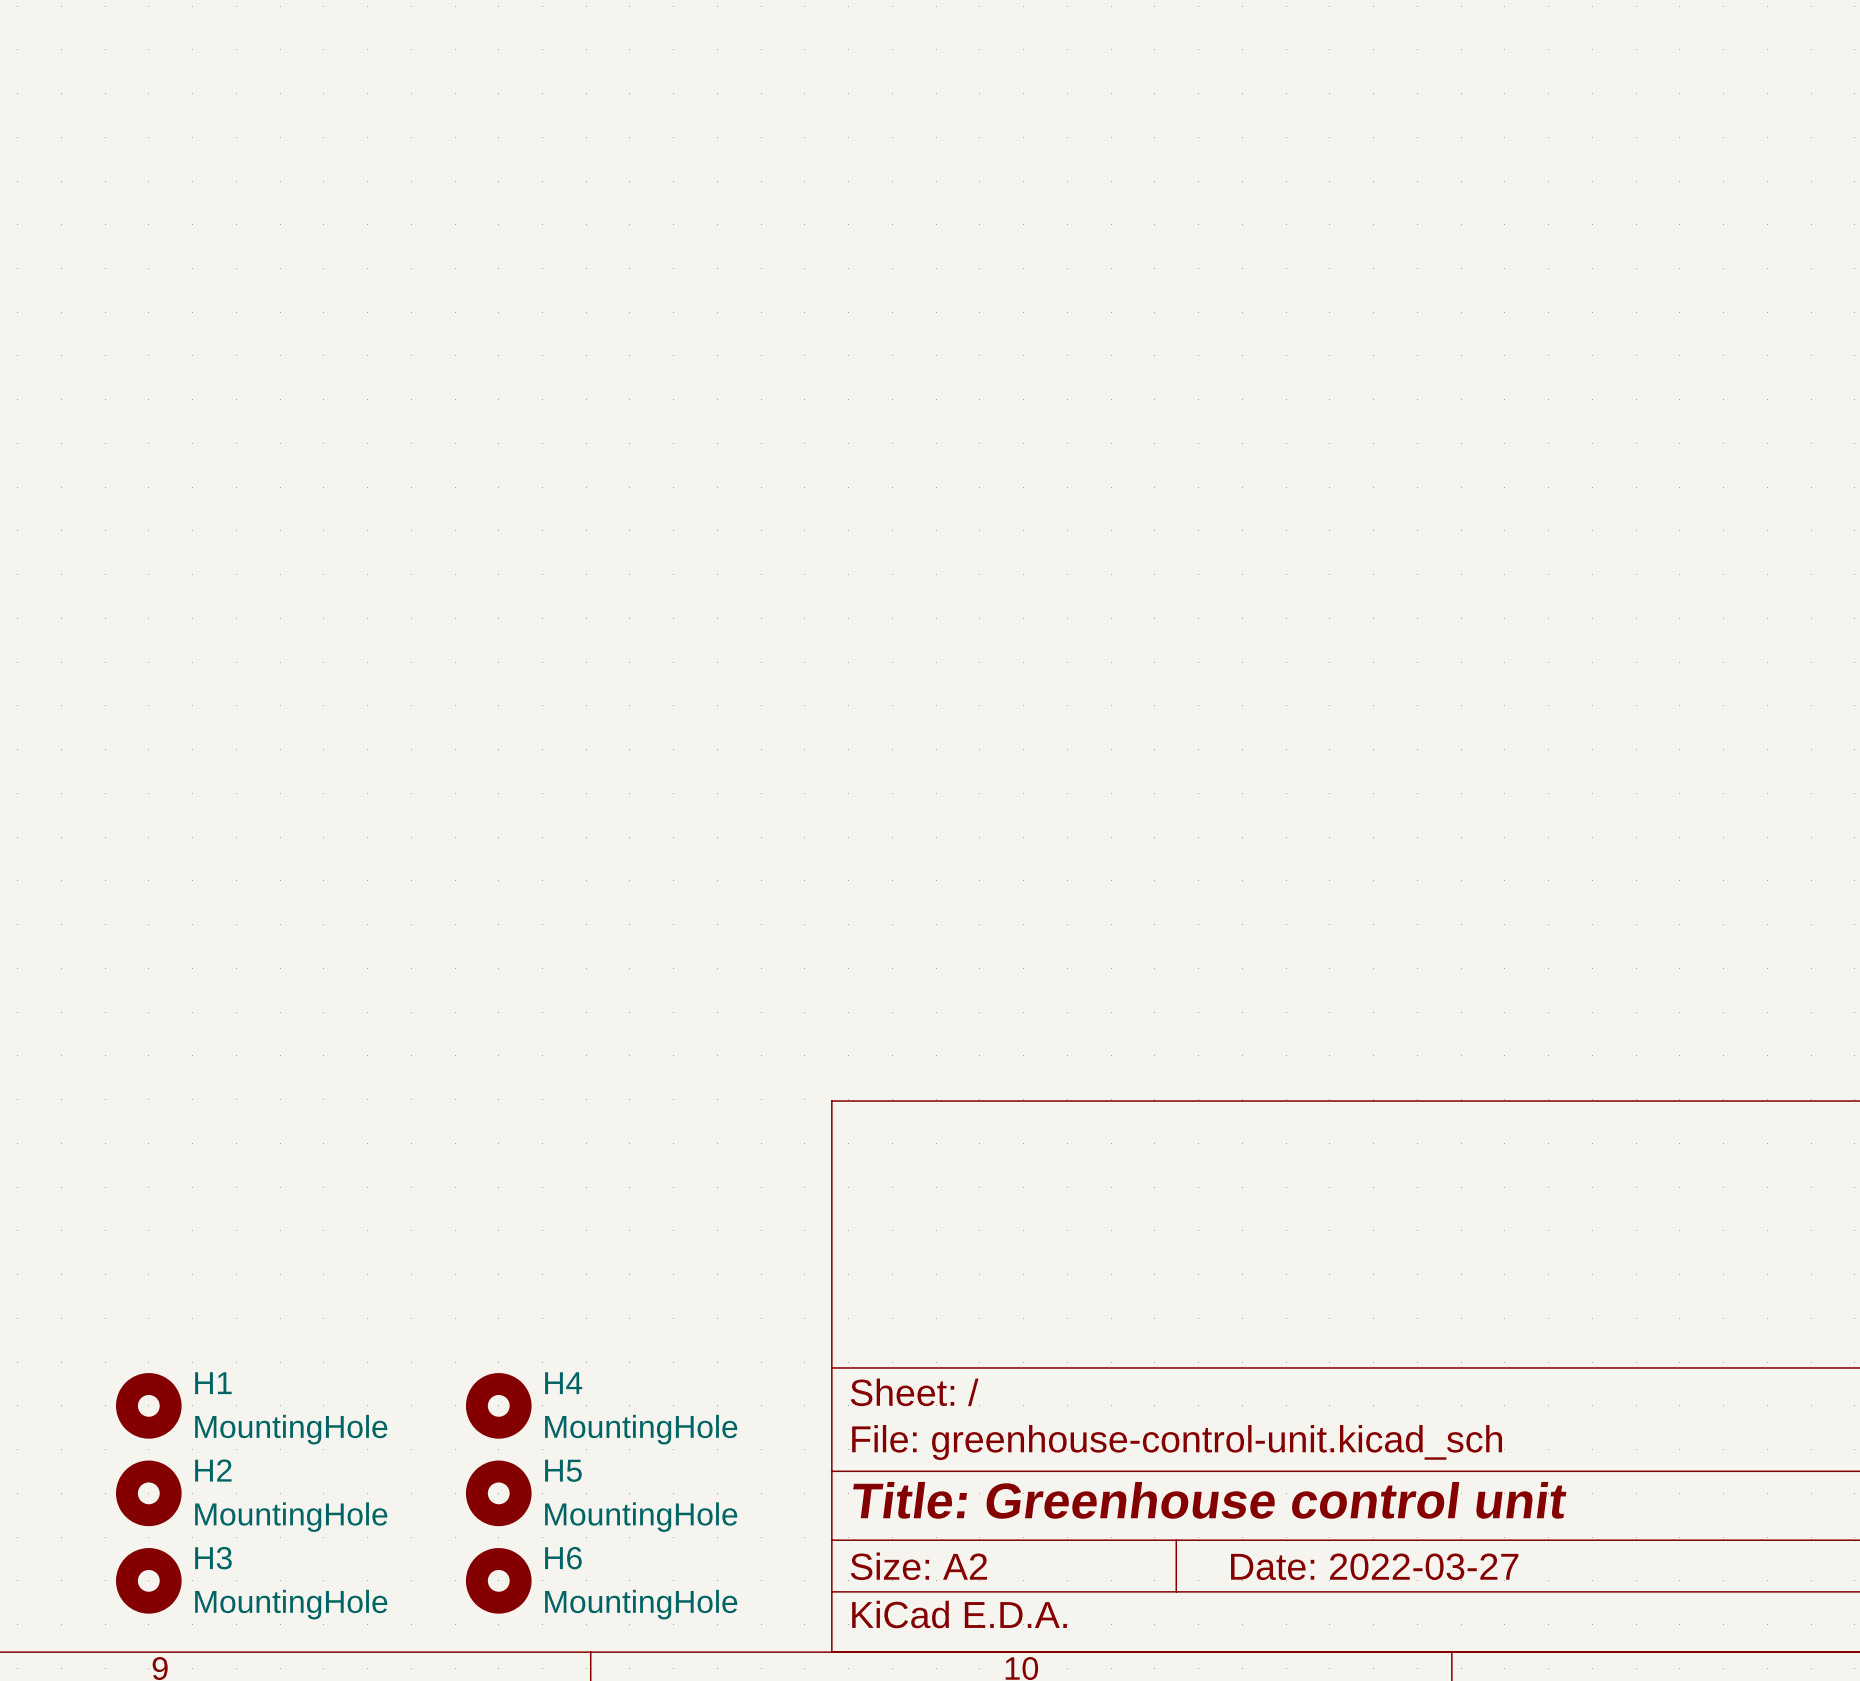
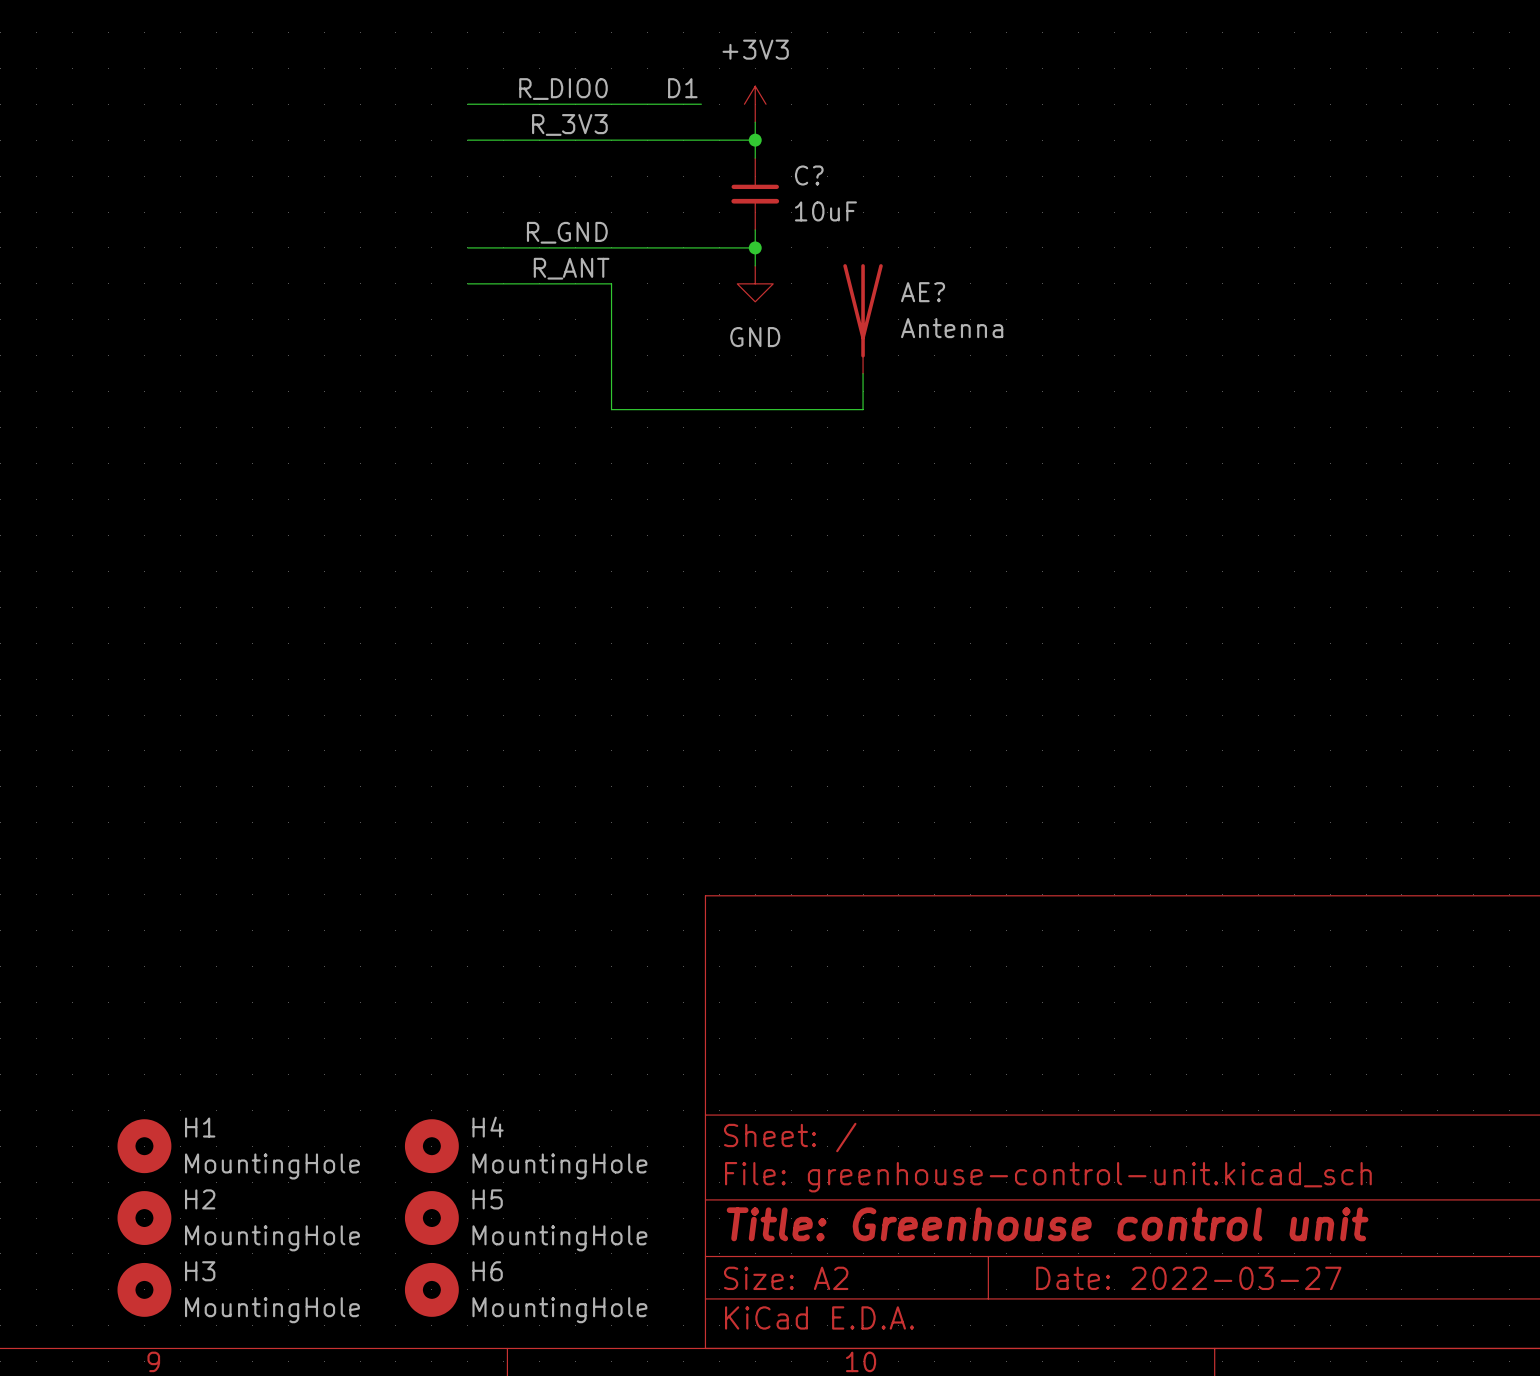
label: none -> D1 (682, 88)
label: none -> R_DIO0 (563, 89)
wire: none -> (467, 104) (701, 104)
power symbol: none -> +3V3 (755, 104)
wire: none -> (755, 122) (755, 158)
label: none -> R_3V3 (569, 124)
wire: none -> (467, 140) (755, 140)
junction: none -> (755, 140)
C?: none -> 10uF (755, 194)
wire: none -> (755, 229) (755, 265)
label: none -> R_GND (567, 232)
wire: none -> (467, 247) (755, 247)
junction: none -> (755, 247)
label: none -> R_ANT (571, 268)
wire: none -> (467, 283) (611, 283) (611, 409) (863, 409) (863, 373)
power symbol: none -> GND (755, 283)
AE?: none -> Antenna (863, 318)

